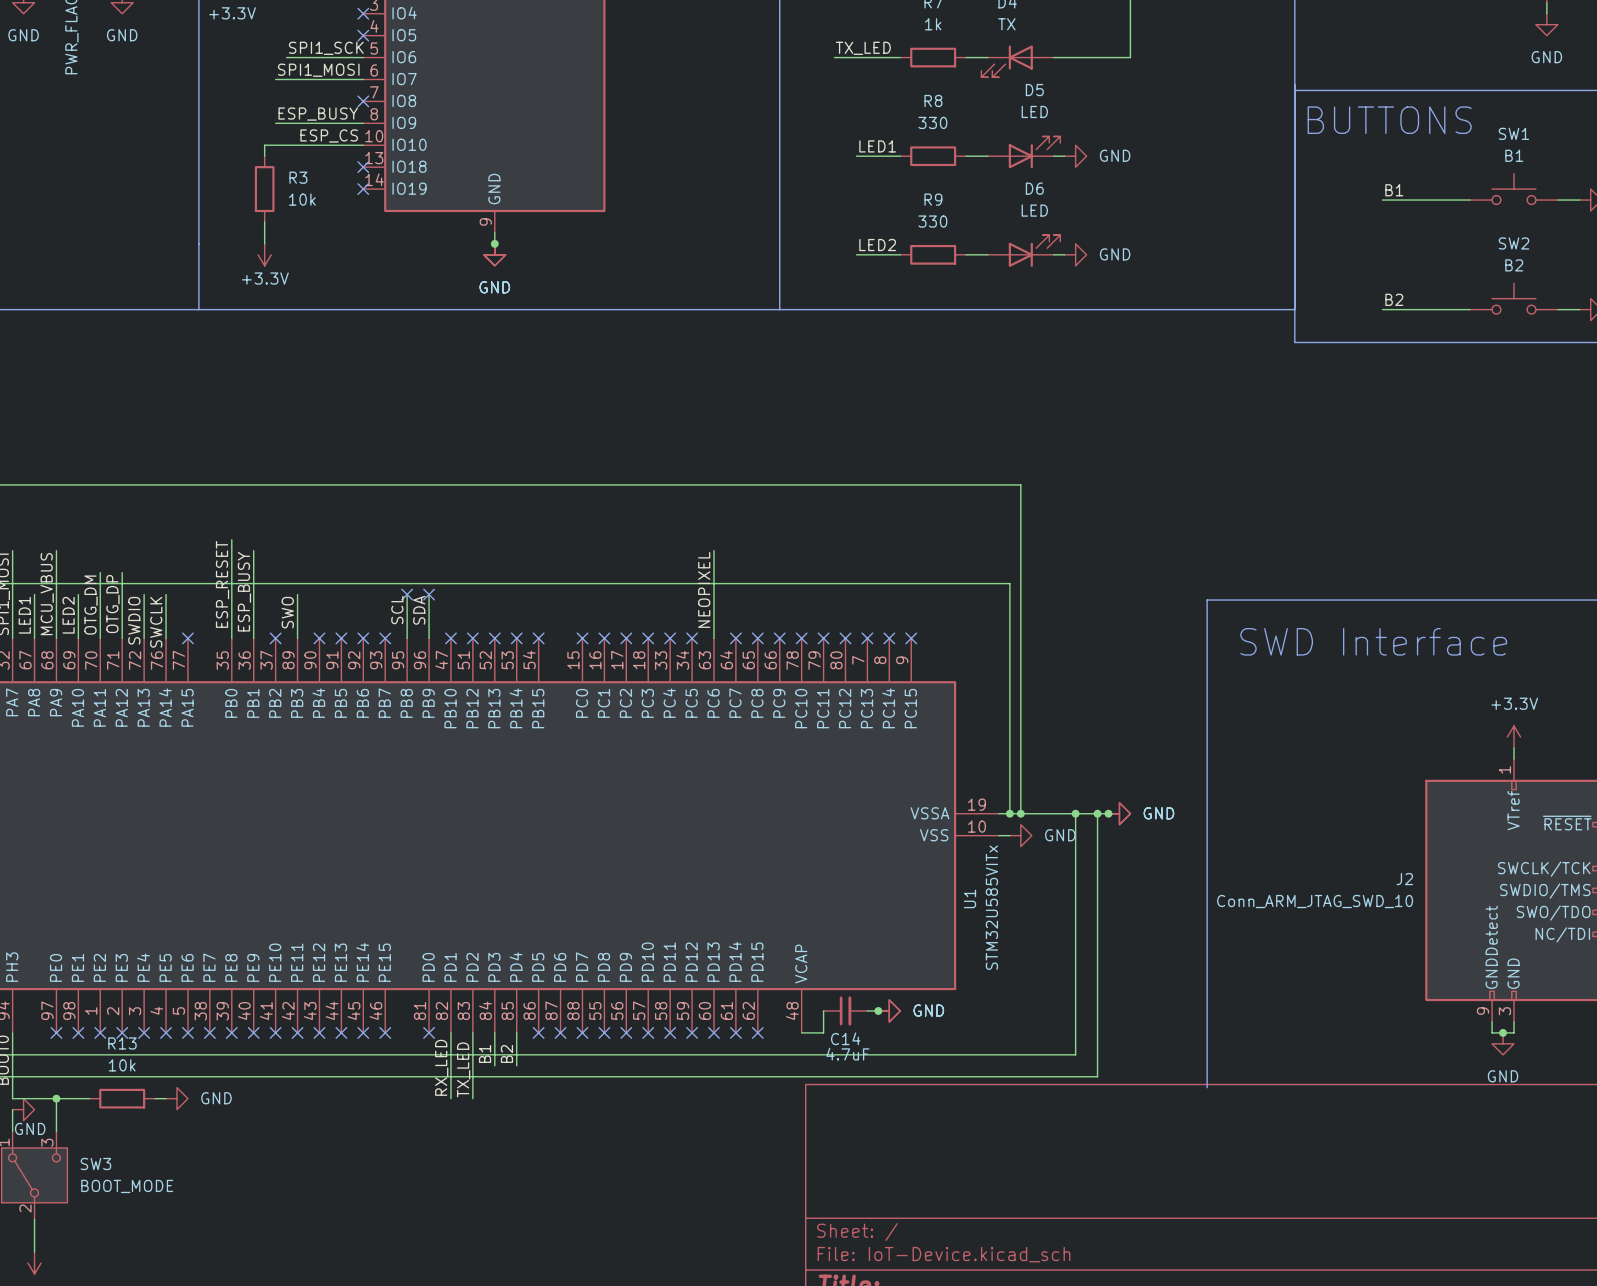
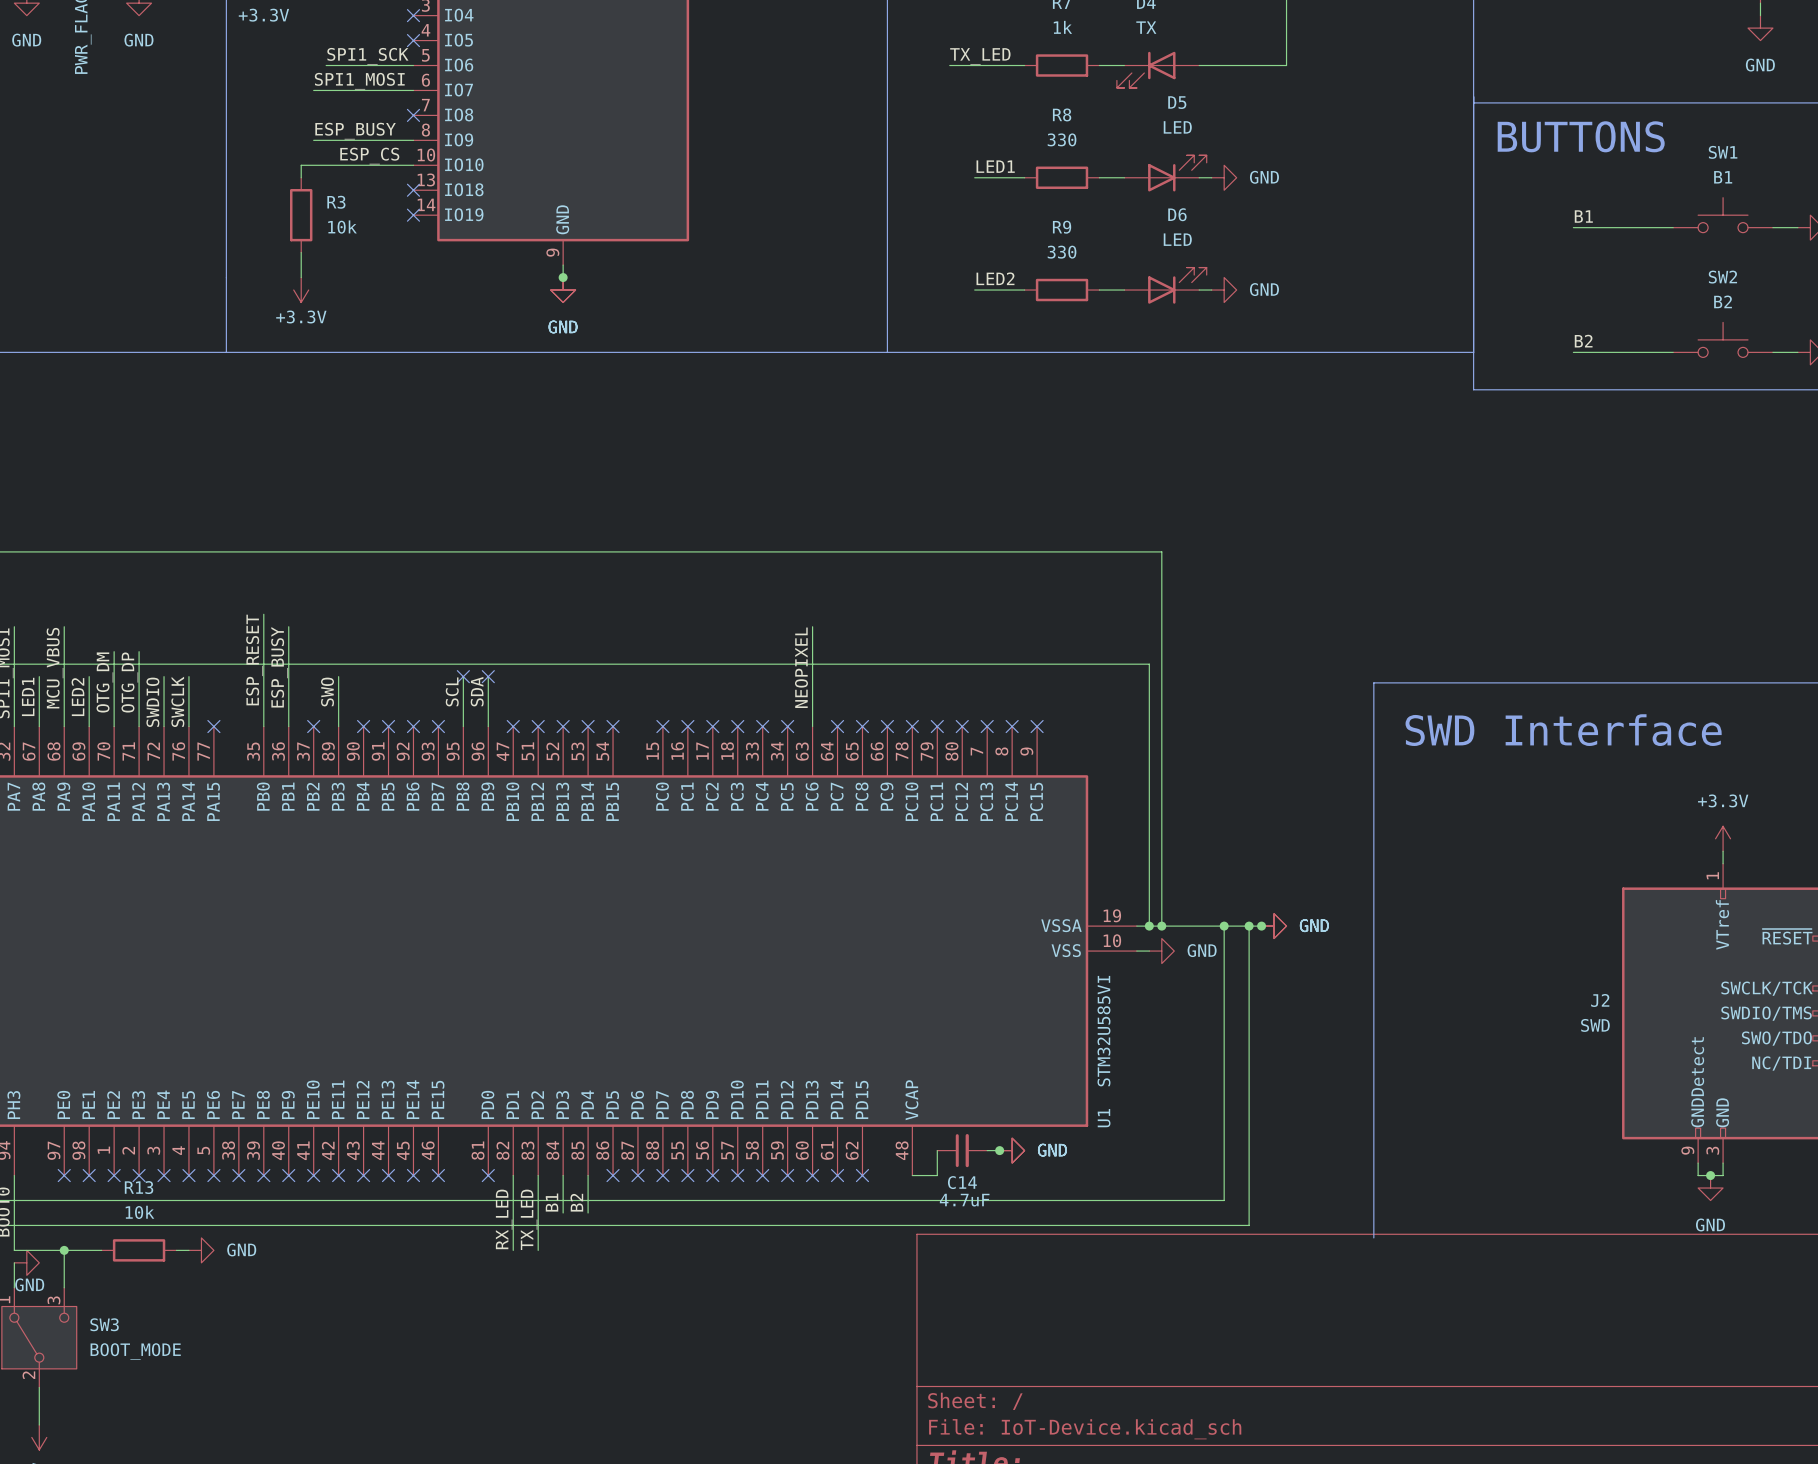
U1 name position: U1 (970, 898) -> U1 (1104, 1118)
J2 value: Conn_ARM_JTAG_SWD_10 (1315, 901) -> SWD (1595, 1025)
U1 value: STM32U585VITx (991, 907) -> STM32U585VI (1103, 1031)

